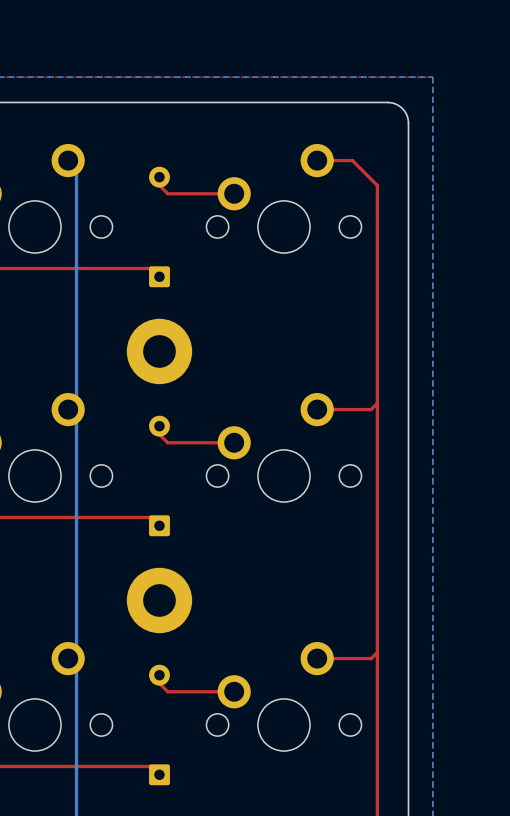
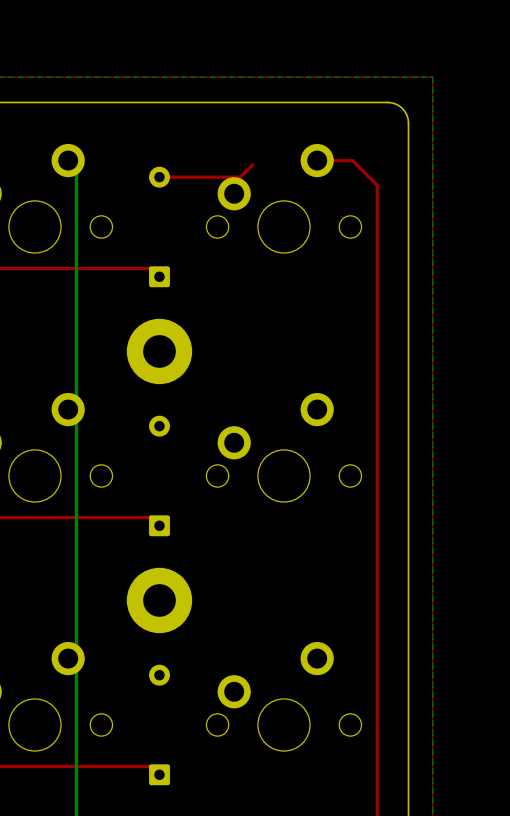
top track: none -> (252, 164) (240, 177) (159, 177)
top track: (159, 185) (167, 193) (234, 193) -> none
top track: (377, 403) (371, 409) (317, 409) -> none
top track: (159, 434) (167, 442) (234, 442) -> none
top track: (377, 652) (371, 658) (317, 658) -> none
top track: (159, 673) (159, 683) (167, 691) (234, 691) -> none

